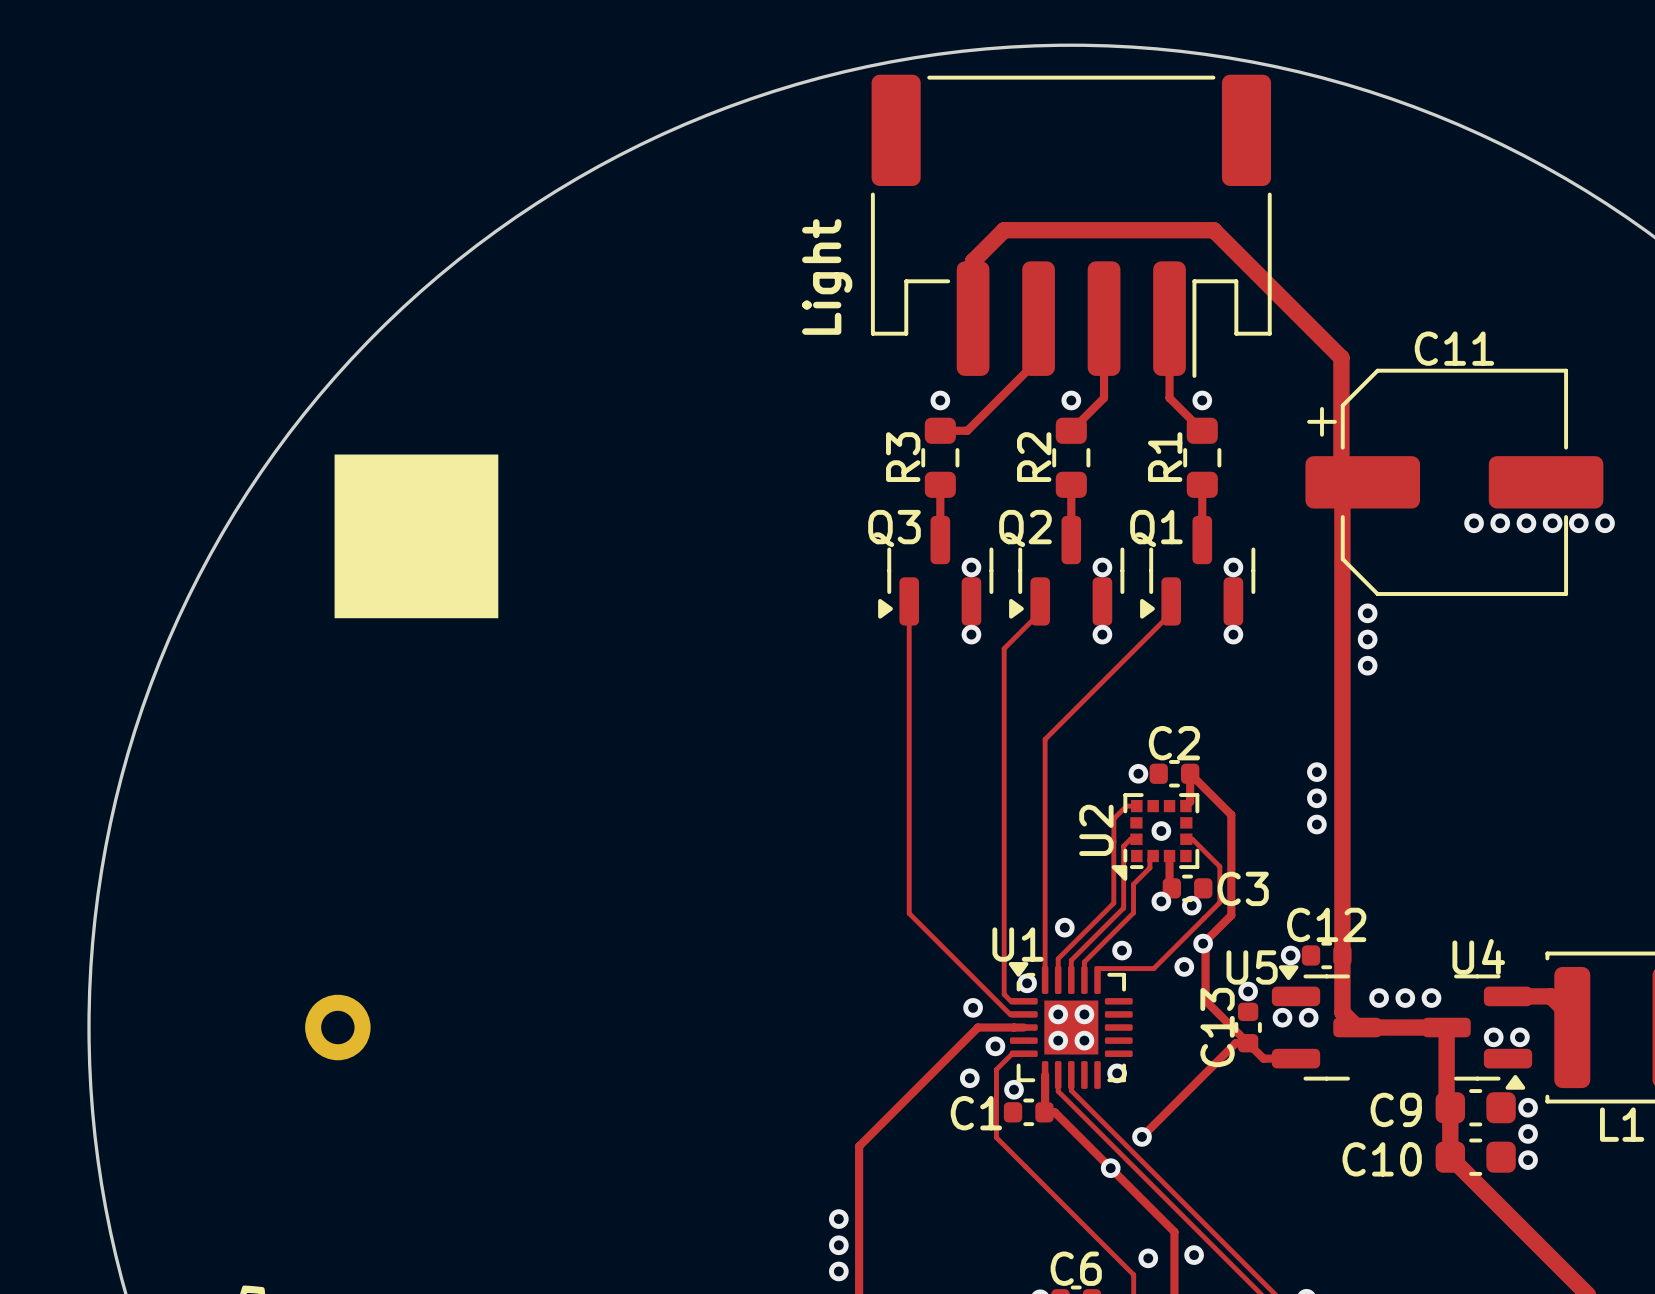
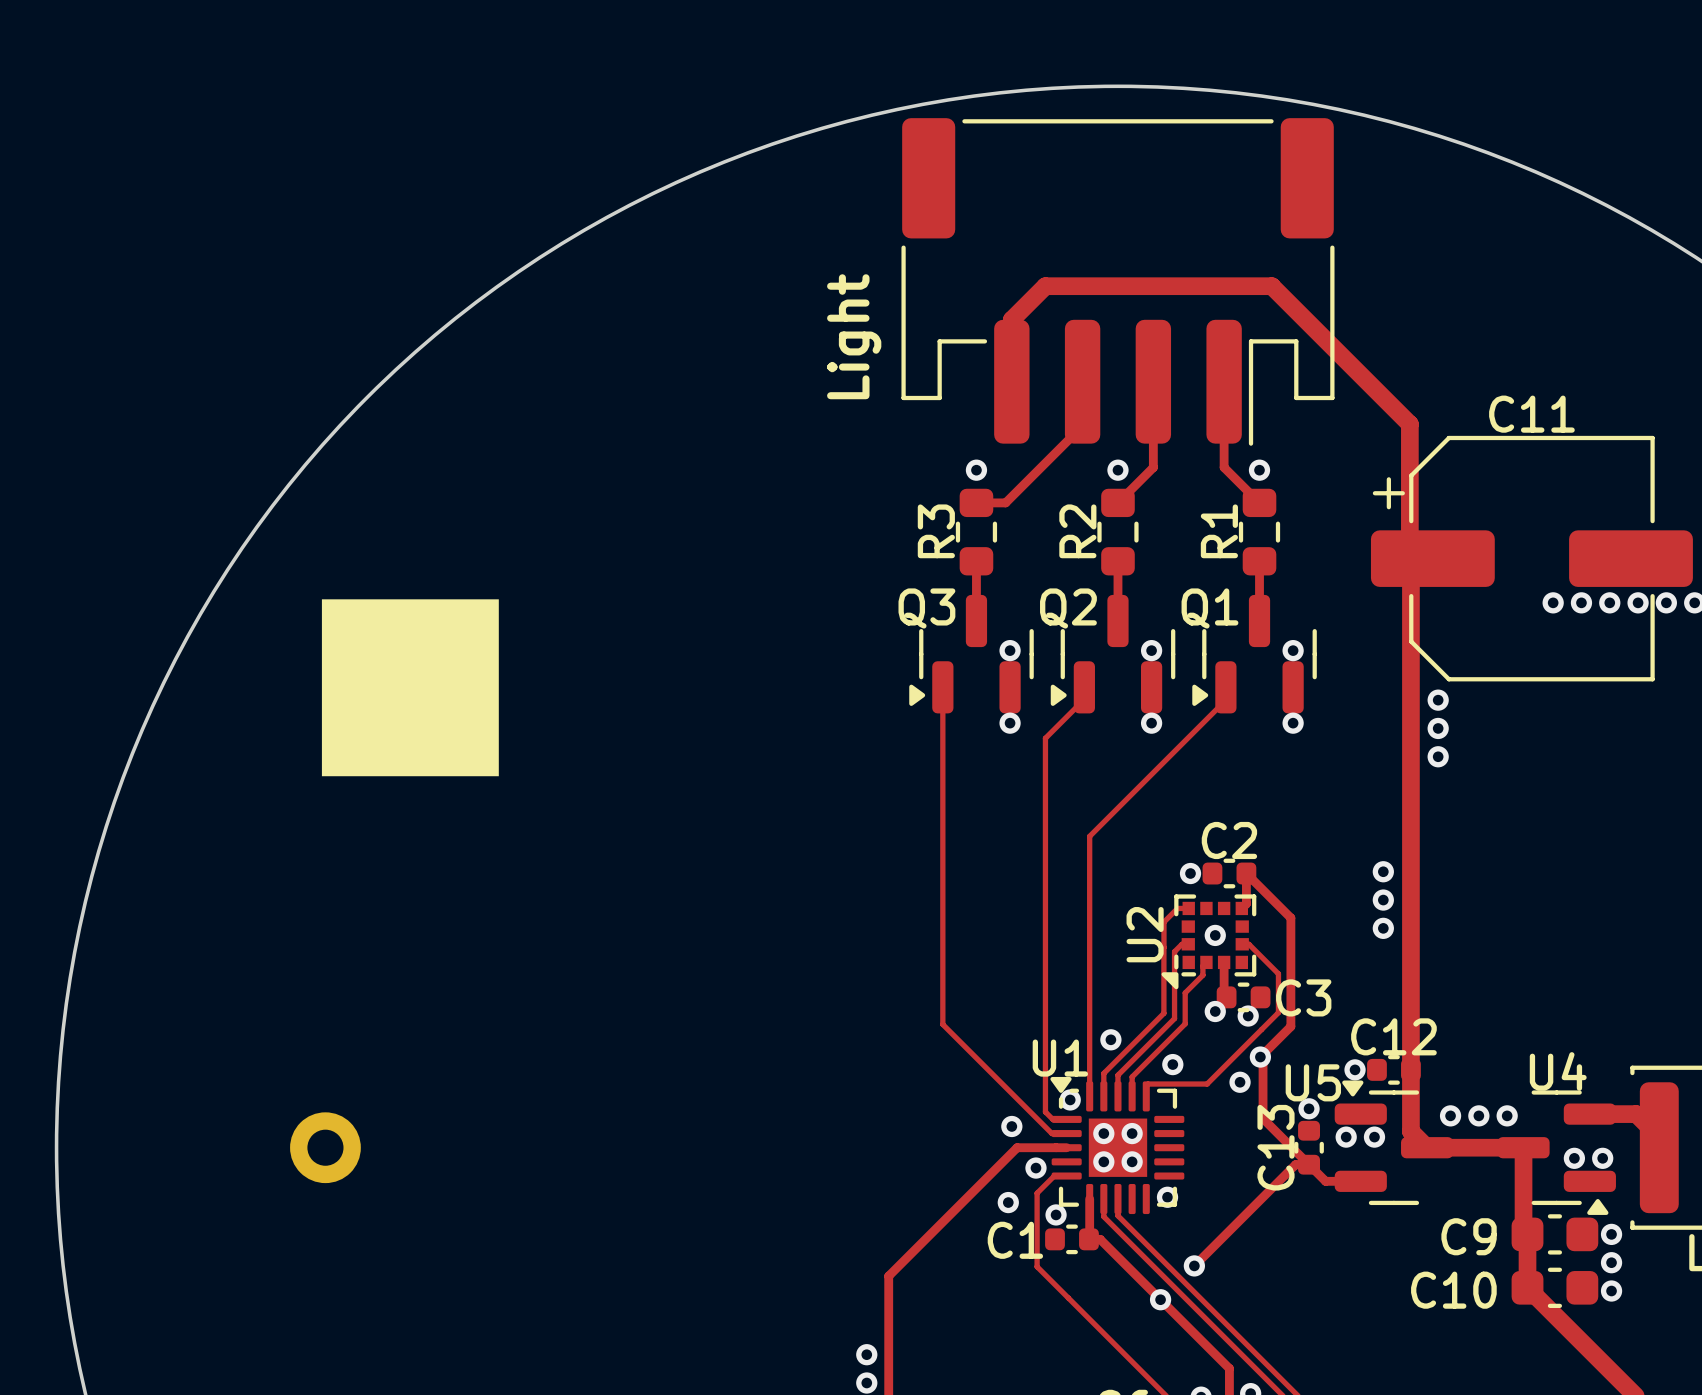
drawing position: (416, 536) -> (410, 687)

